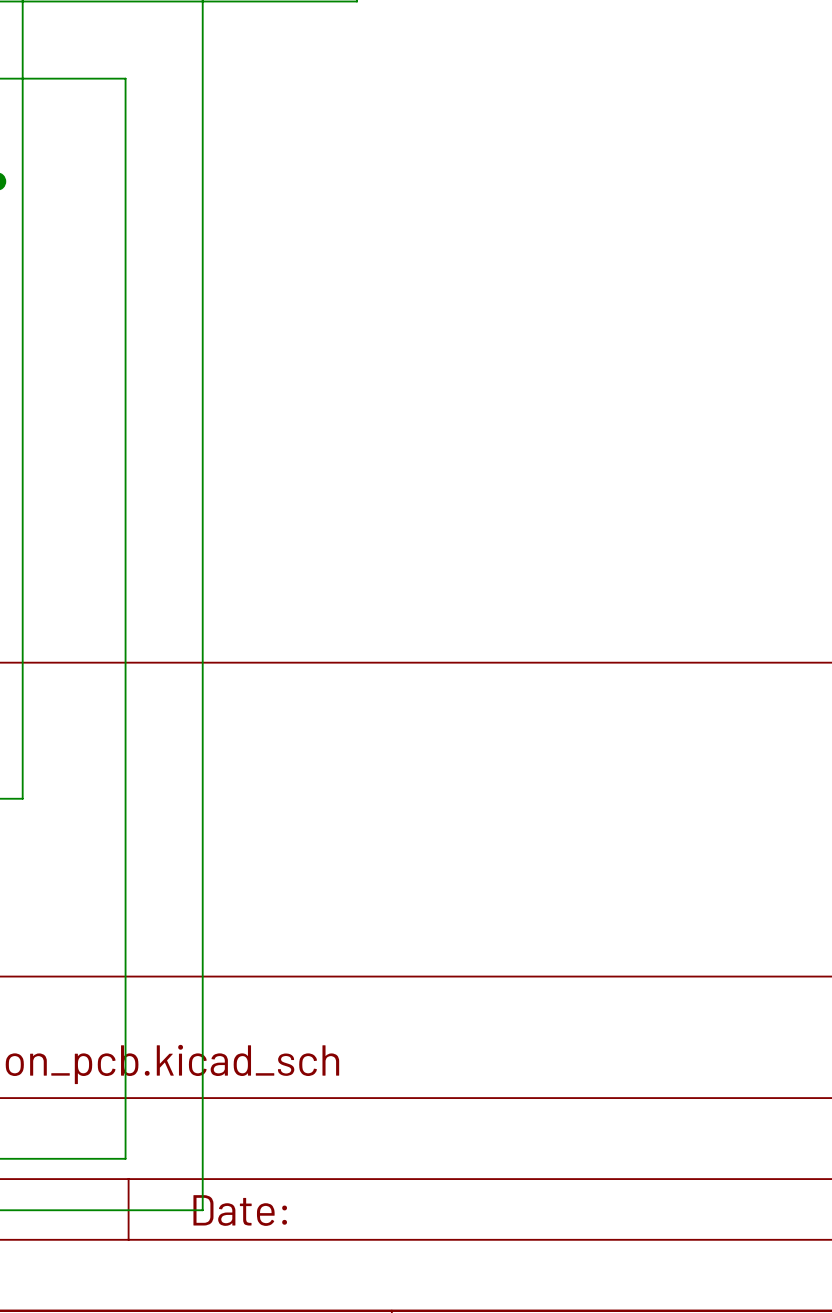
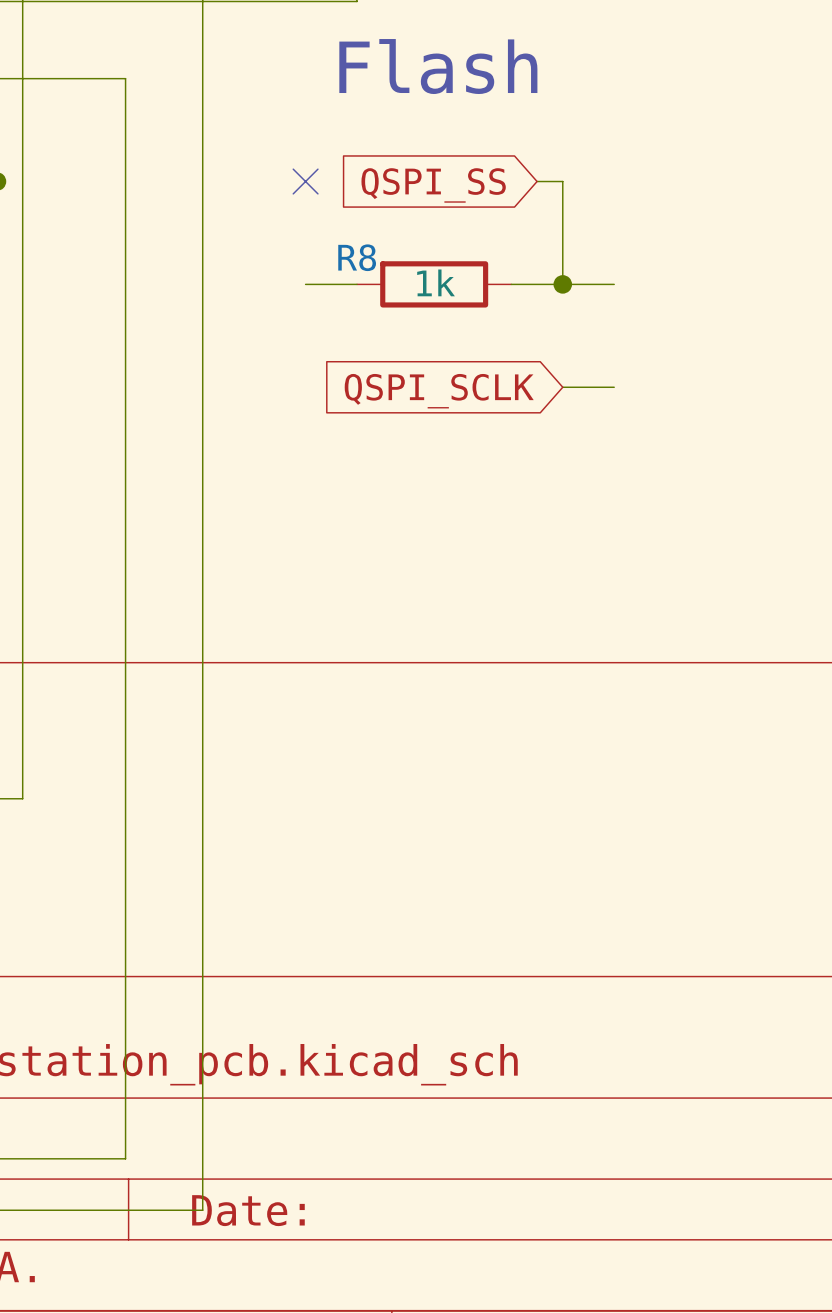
text: none -> Flash (438, 66)
no-connect mark: none -> (305, 181)
wire: none -> (537, 181) (562, 181) (562, 284)
global label: none -> QSPI_SS (433, 185)
wire: none -> (305, 284) (357, 284)
R8: none -> 1k (434, 284)
wire: none -> (511, 284) (614, 284)
junction: none -> (562, 284)
wire: none -> (562, 387) (614, 387)
global label: none -> QSPI_SCLK (439, 391)

